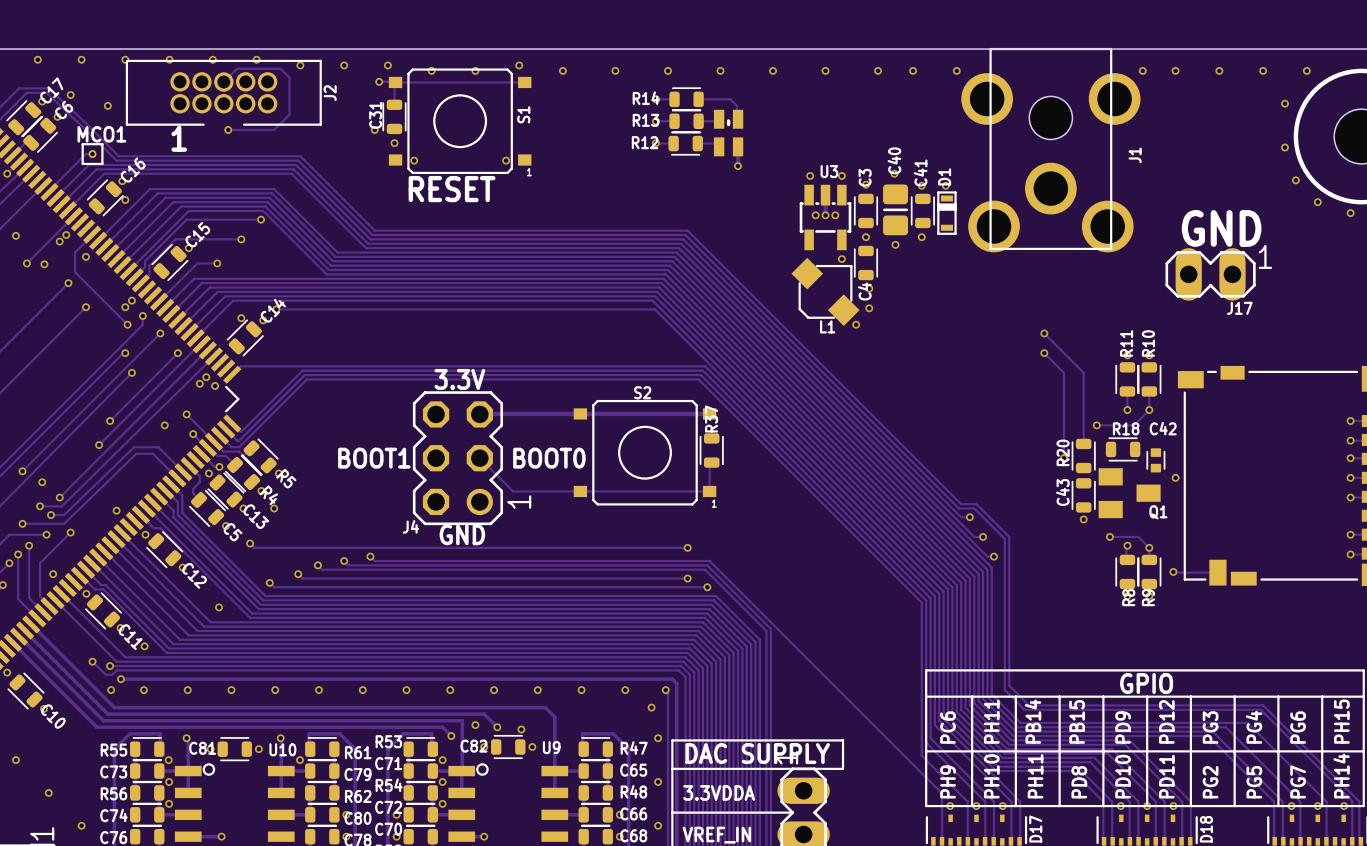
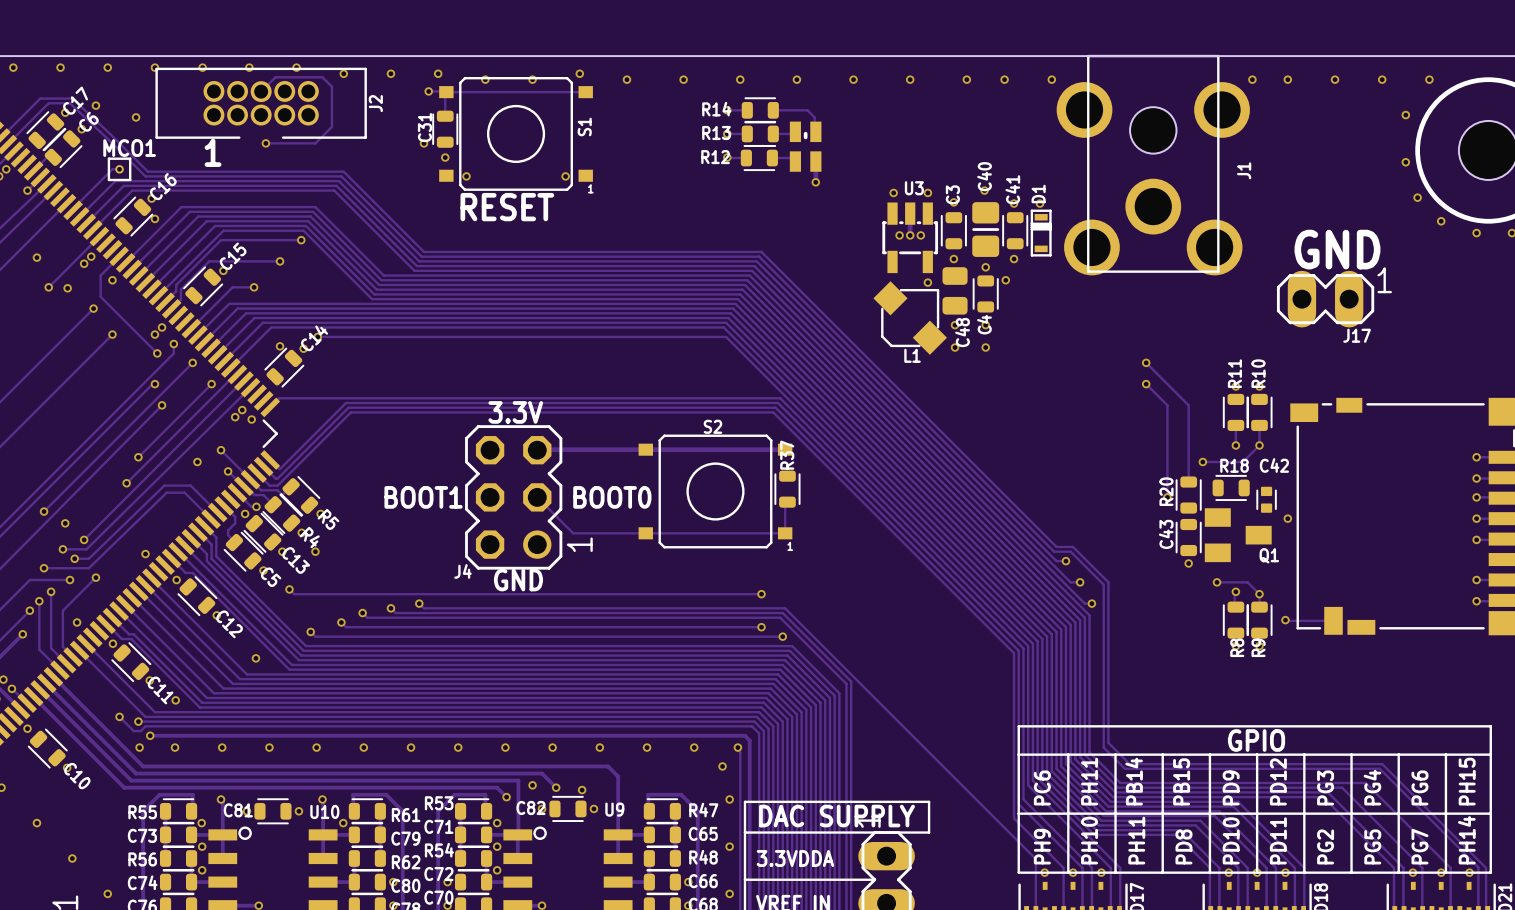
via: none -> (1005, 280)
C4 position: (865, 263) -> (985, 293)
C48: none -> (955, 290)
via: (869, 288) -> none
via: none -> (955, 325)
via: none -> (985, 325)
via: (869, 308) -> none
via: none -> (955, 347)
via: none -> (985, 347)
via: (856, 324) -> none

